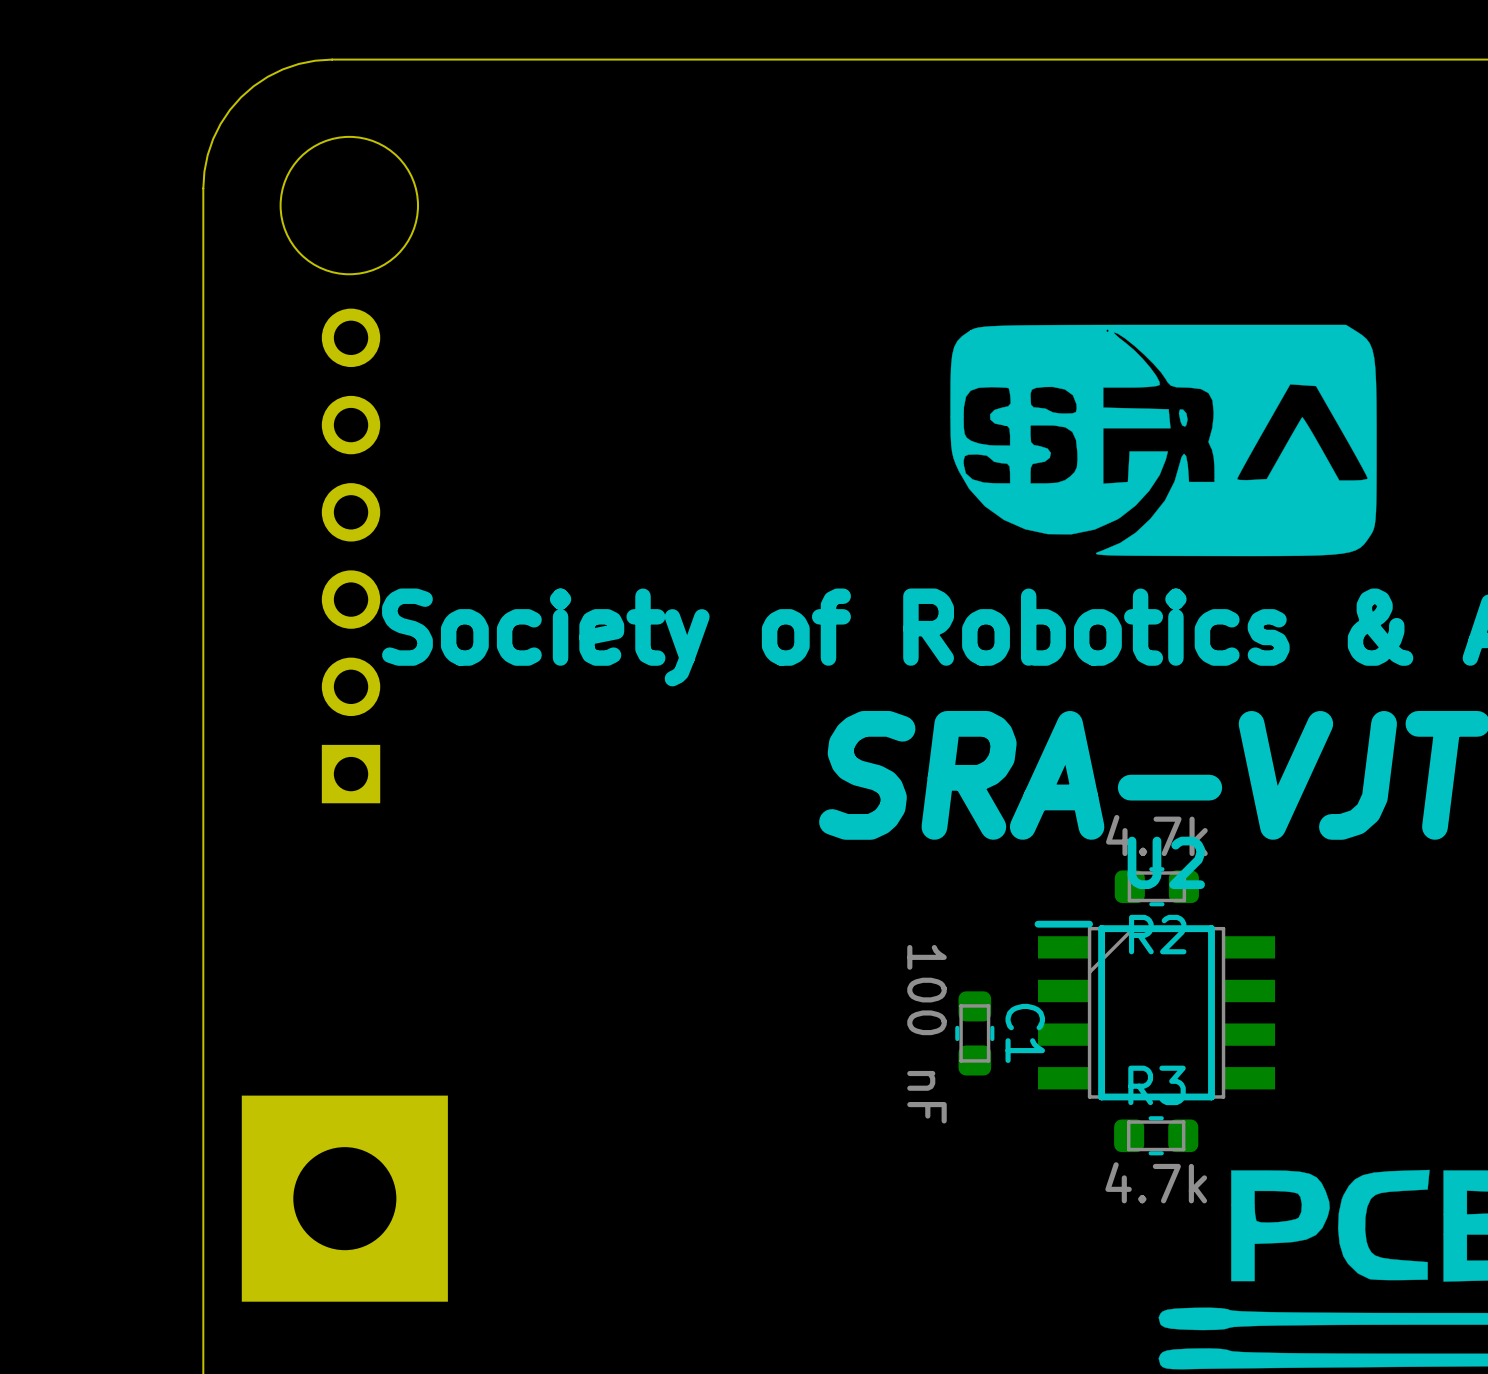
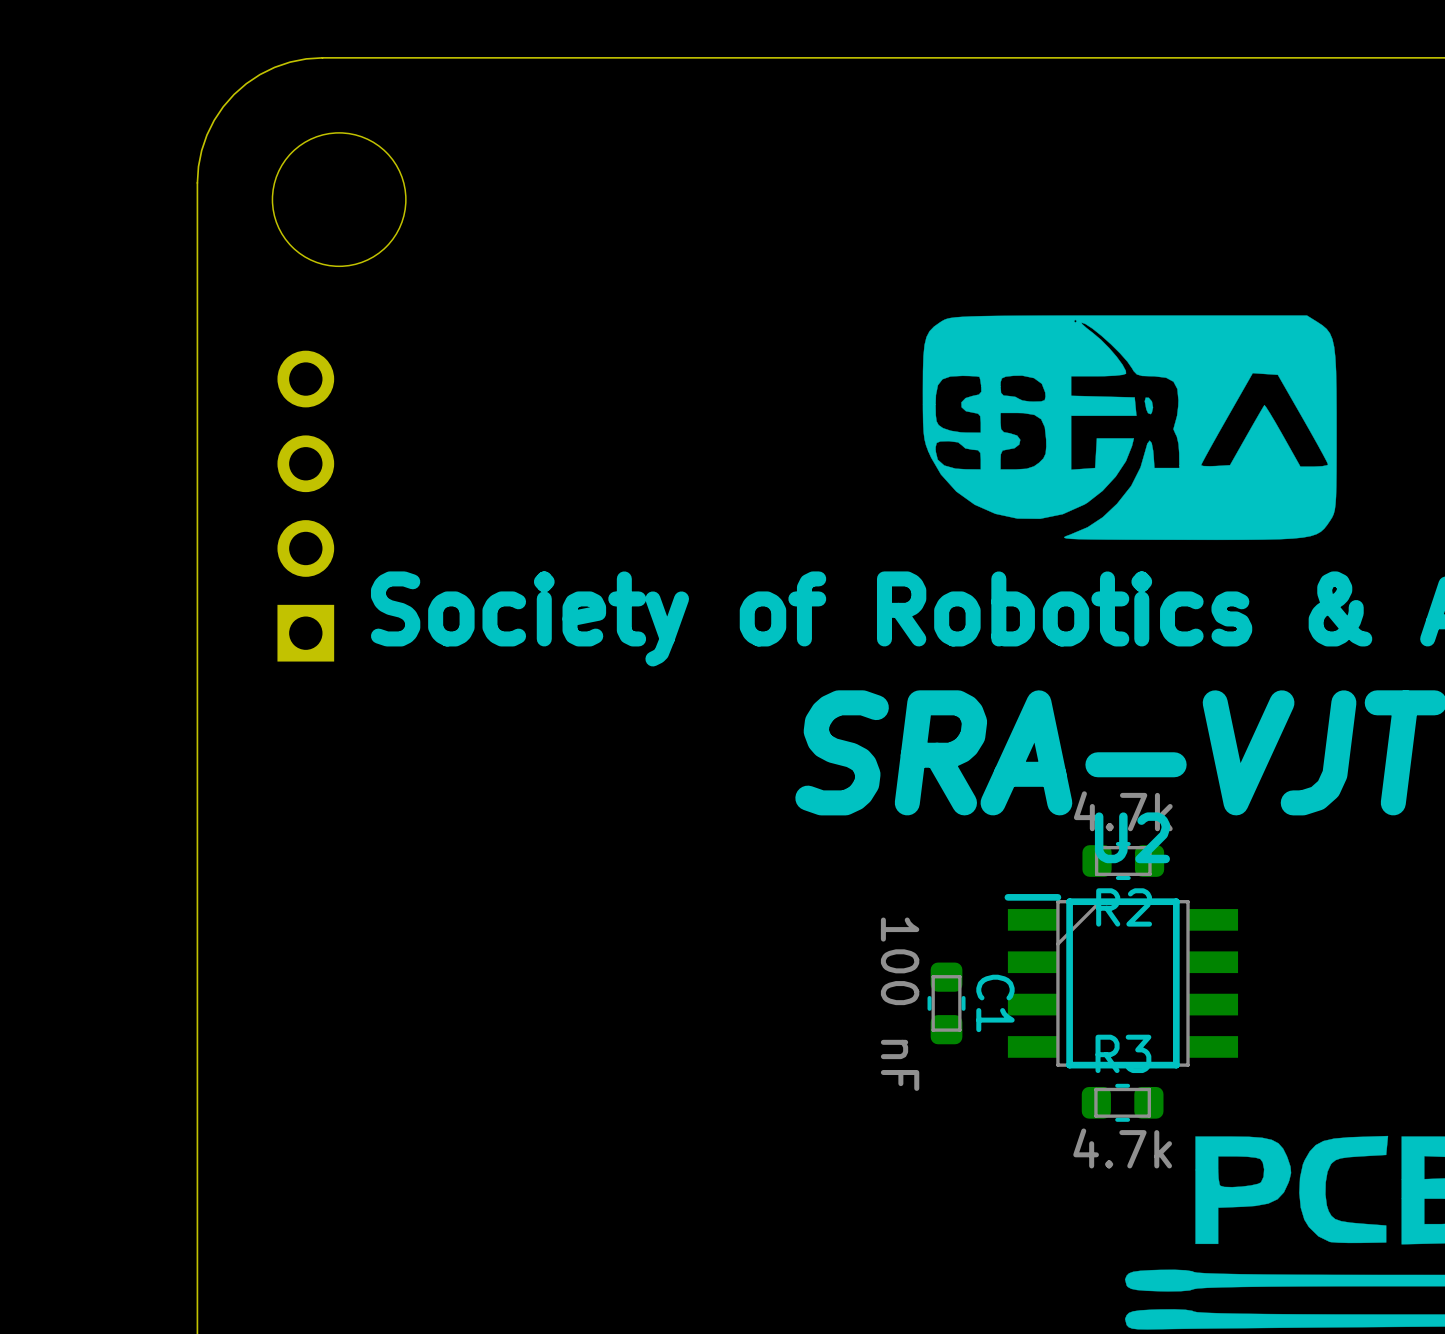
part: none -> (305, 506)
part: (351, 555) -> none
part: (344, 1198) -> none

